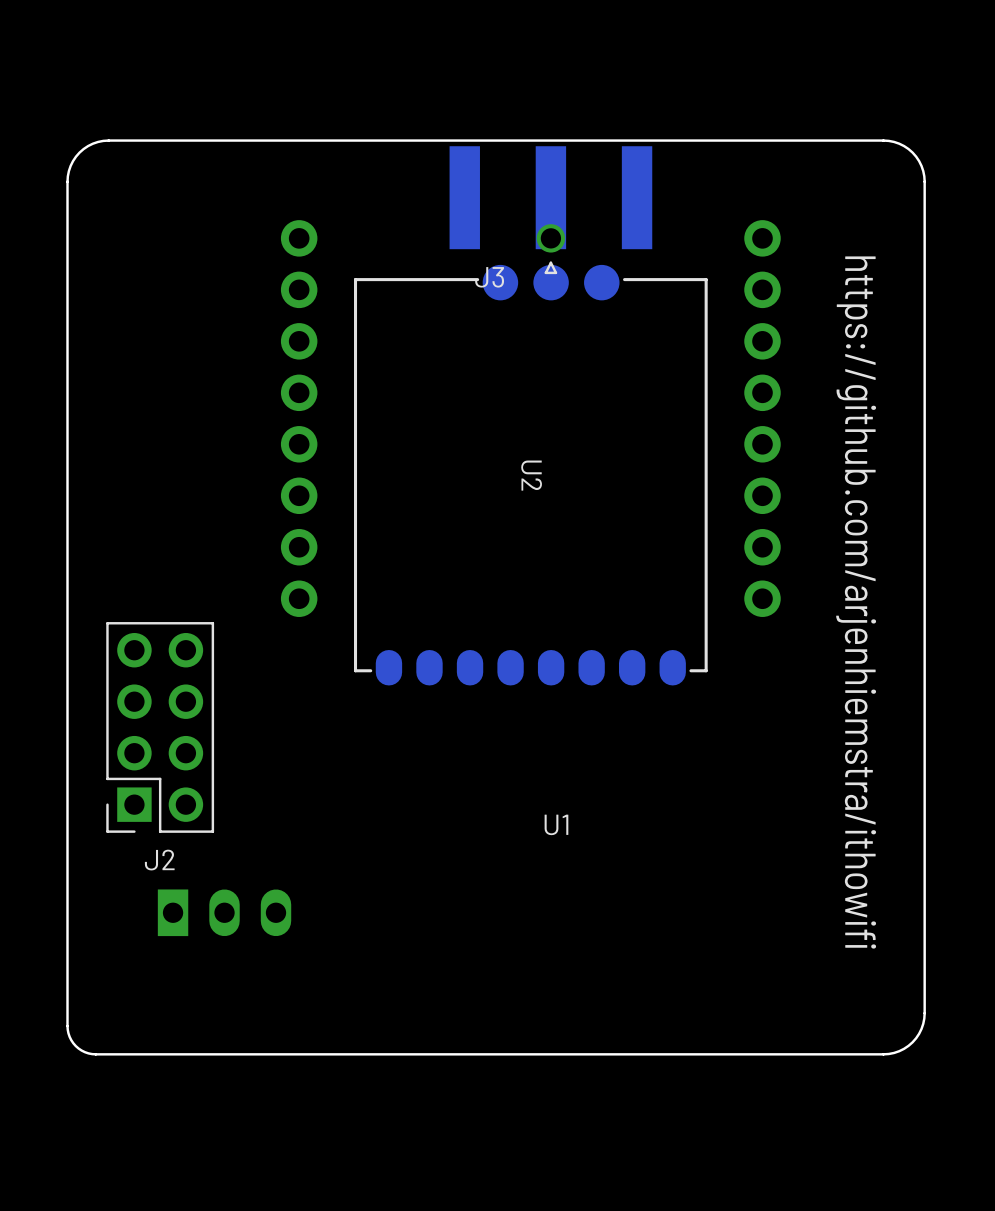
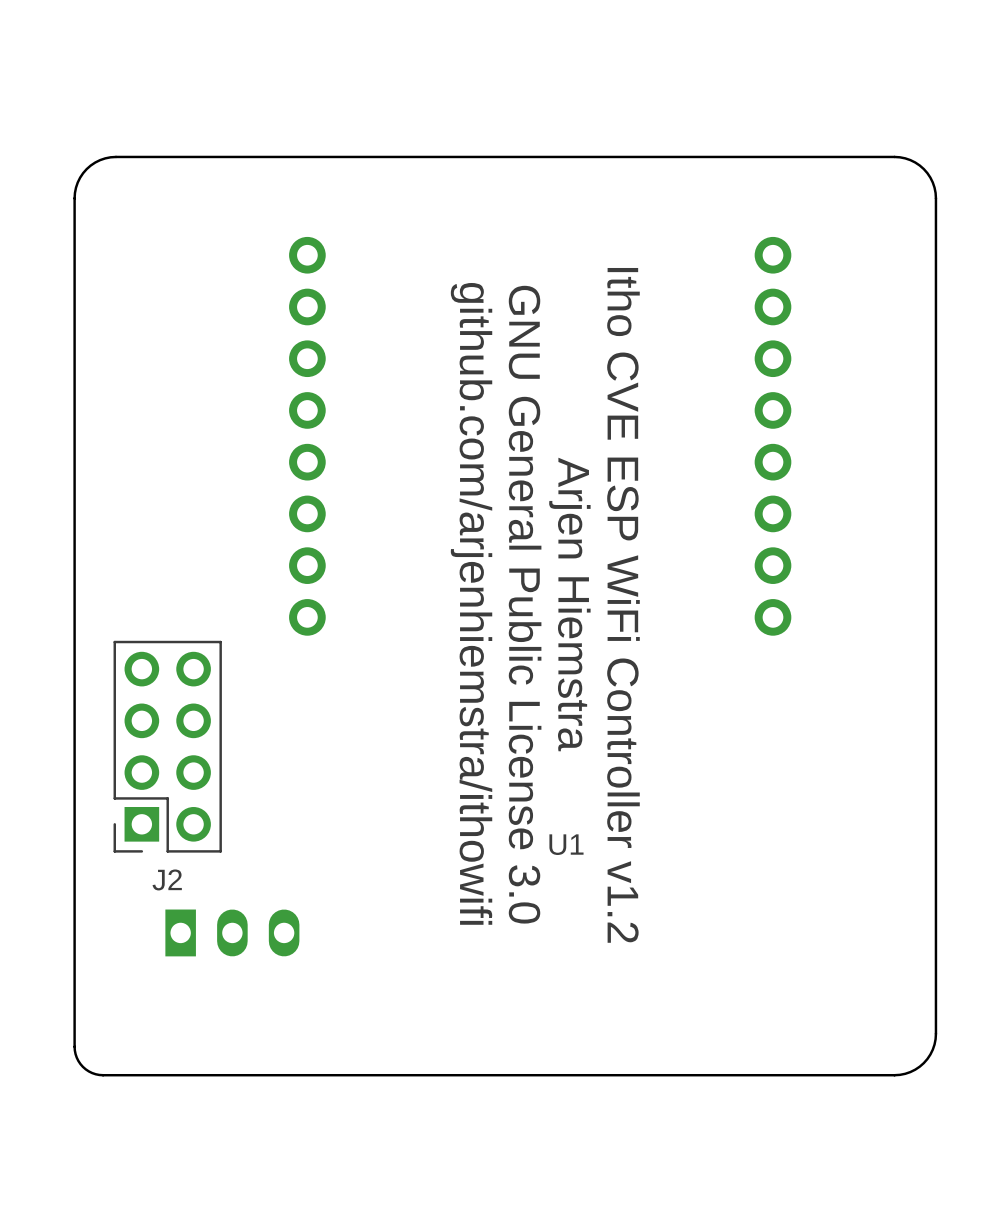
J3: (550, 210) -> none
part: (550, 238) -> none
U2: (530, 475) -> none
text: none -> github.com/arjenhiemstra/ithowifi (471, 603)
text: none -> GNU General Public License 3.0 (525, 604)
text: none -> Arjen Hiemstra (569, 604)
text: none -> Itho CVE ESP WiFi Controller v1.2 (623, 605)
text: https://github.com/arjenhiemstra/ithowifi (856, 602) -> none

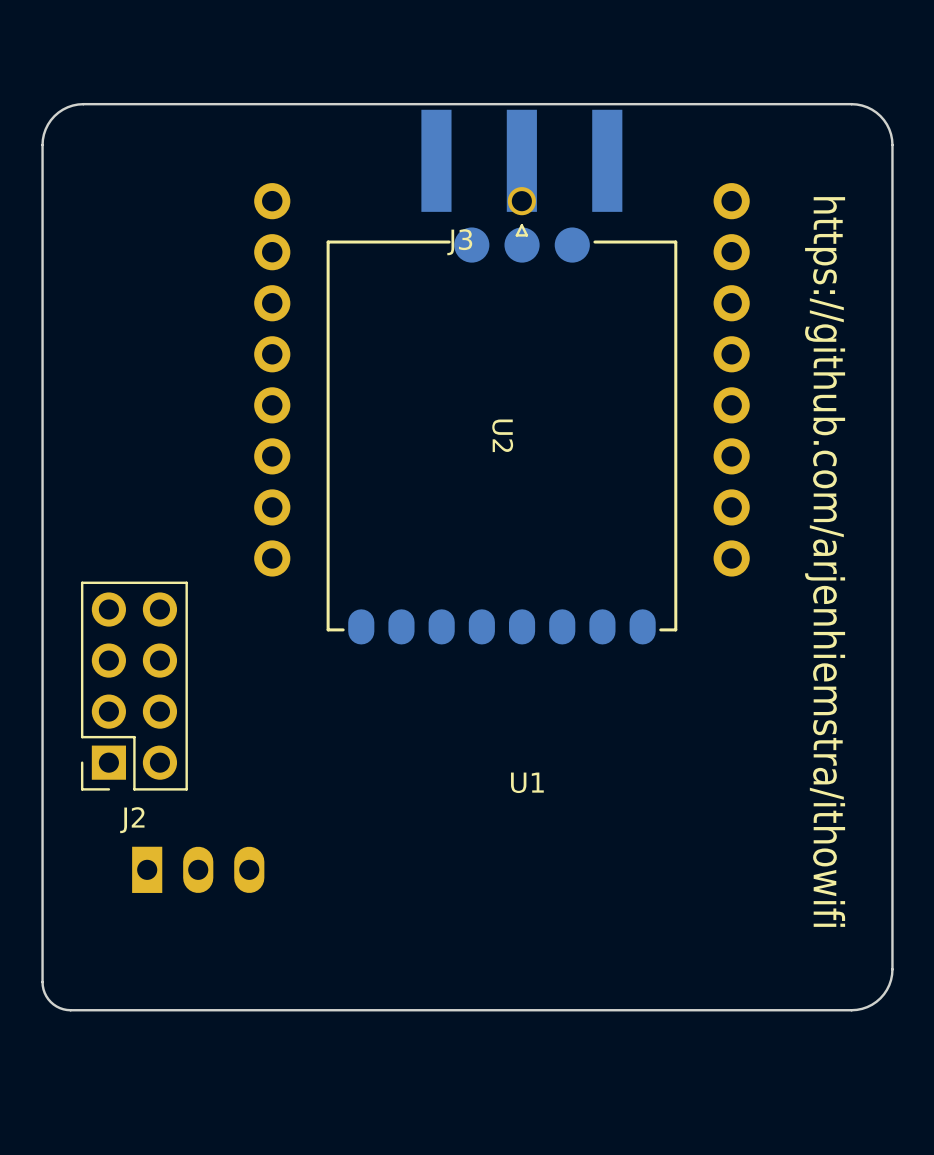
J3: none -> (521, 173)
part: none -> (521, 201)
U2: none -> (501, 435)
text: github.com/arjenhiemstra/ithowifi (471, 603) -> none
text: GNU General Public License 3.0 (525, 604) -> none
text: Arjen Hiemstra (569, 604) -> none
text: Itho CVE ESP WiFi Controller v1.2 (623, 605) -> none
text: none -> https://github.com/arjenhiemstra/ithowifi (825, 561)

